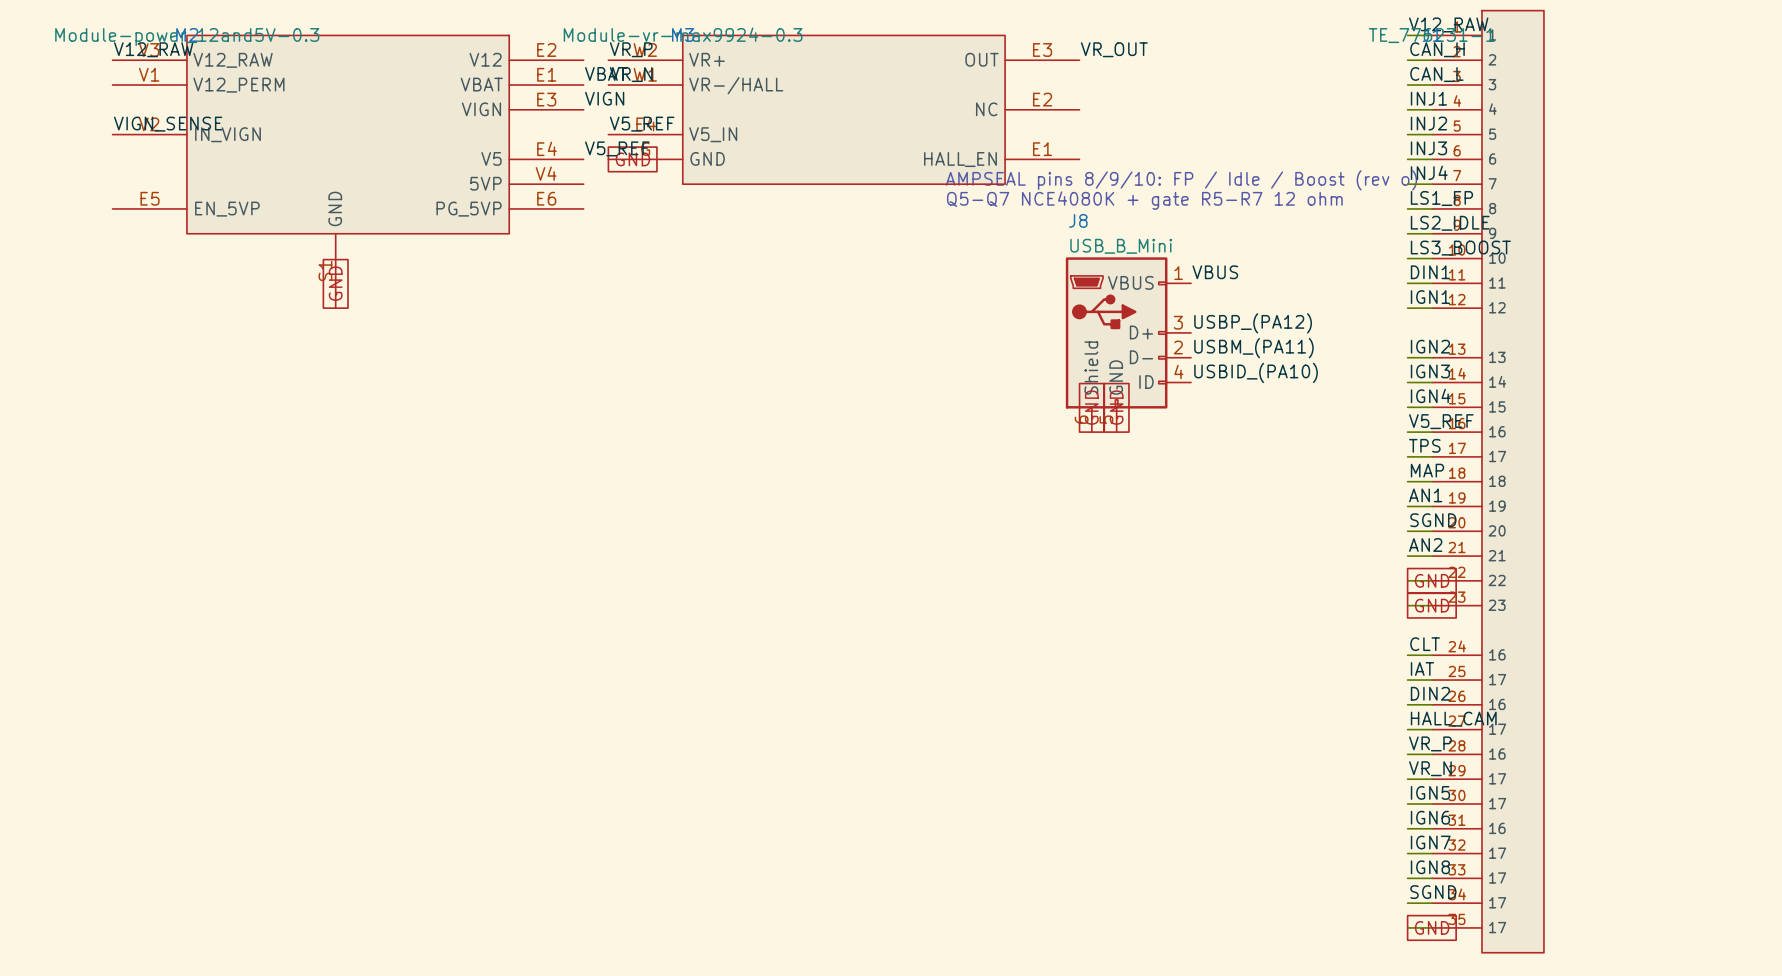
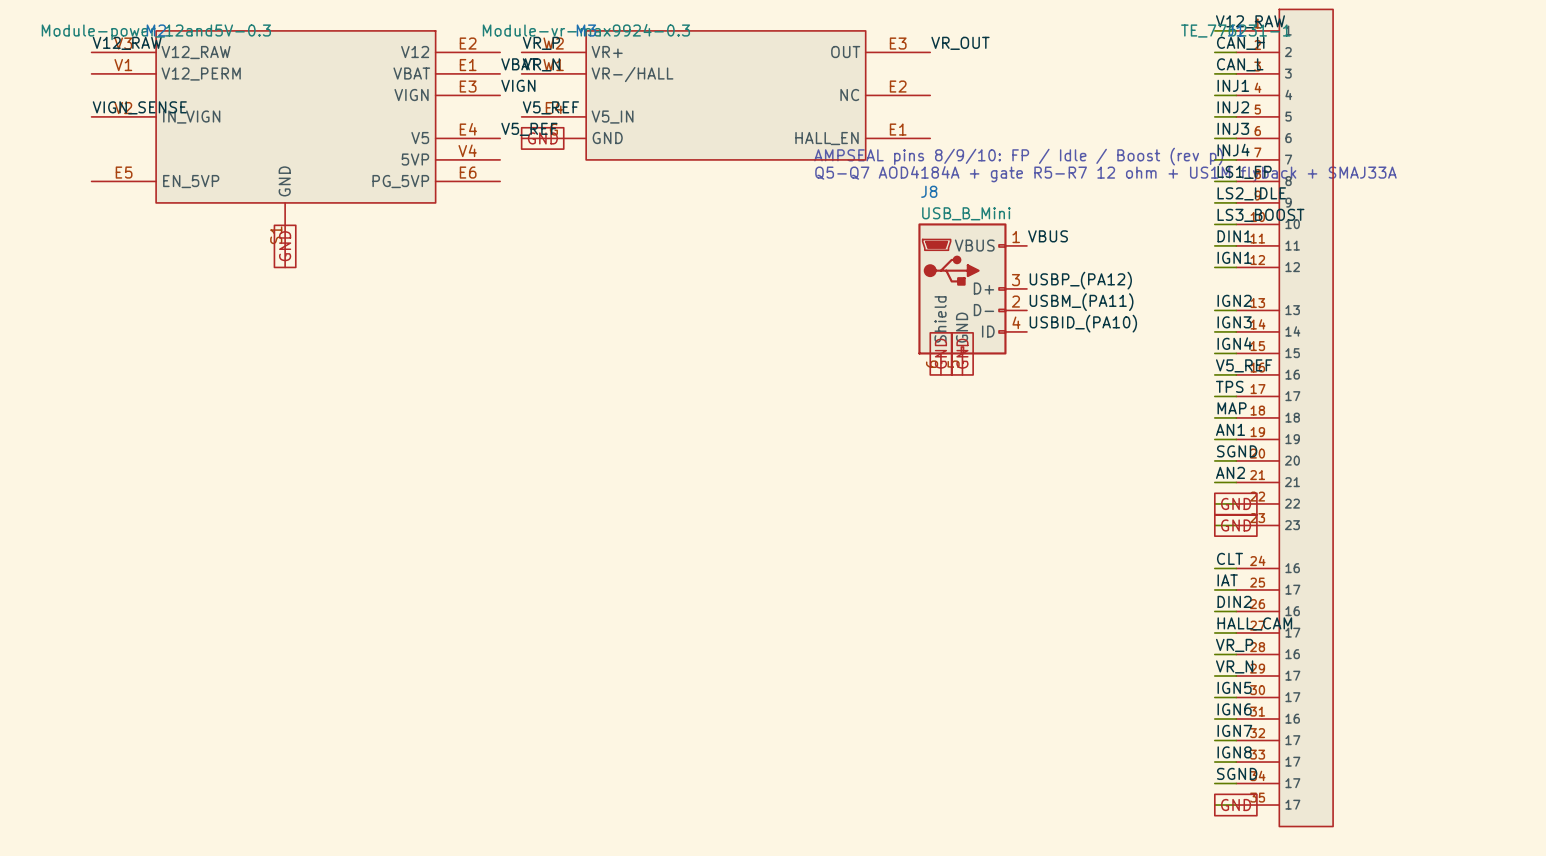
text: AMPSEAL pins 8/9/10: FP / Idle / Boost (rev o) (1181, 180) -> AMPSEAL pins 8/9/10: FP / Idle / Boost (rev p) (1018, 156)
text: Q5-Q7 NCE4080K + gate R5-R7 12 ohm (1144, 200) -> Q5-Q7 AOD4184A + gate R5-R7 12 ohm + US1M flyback + SMAJ33A (1105, 174)

